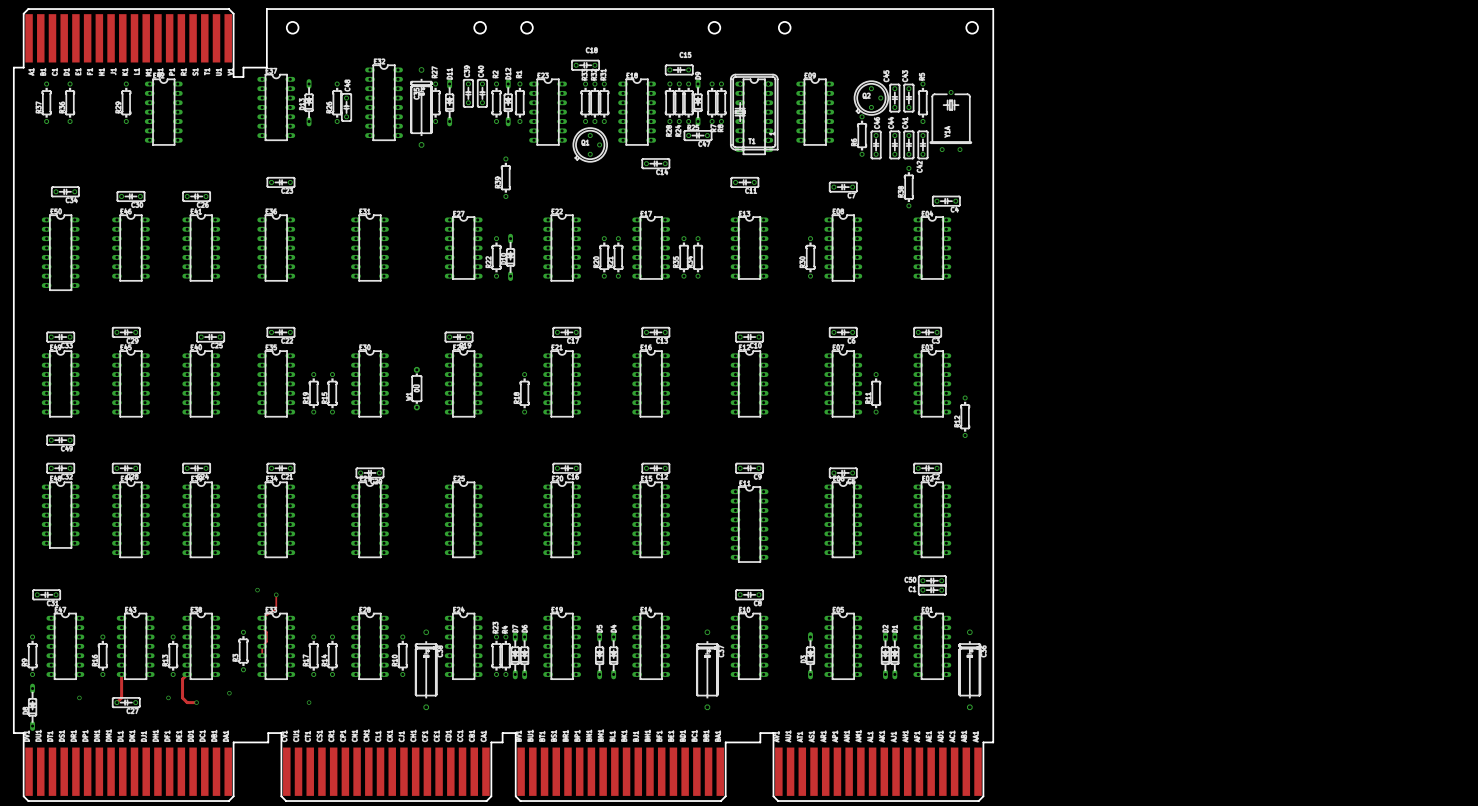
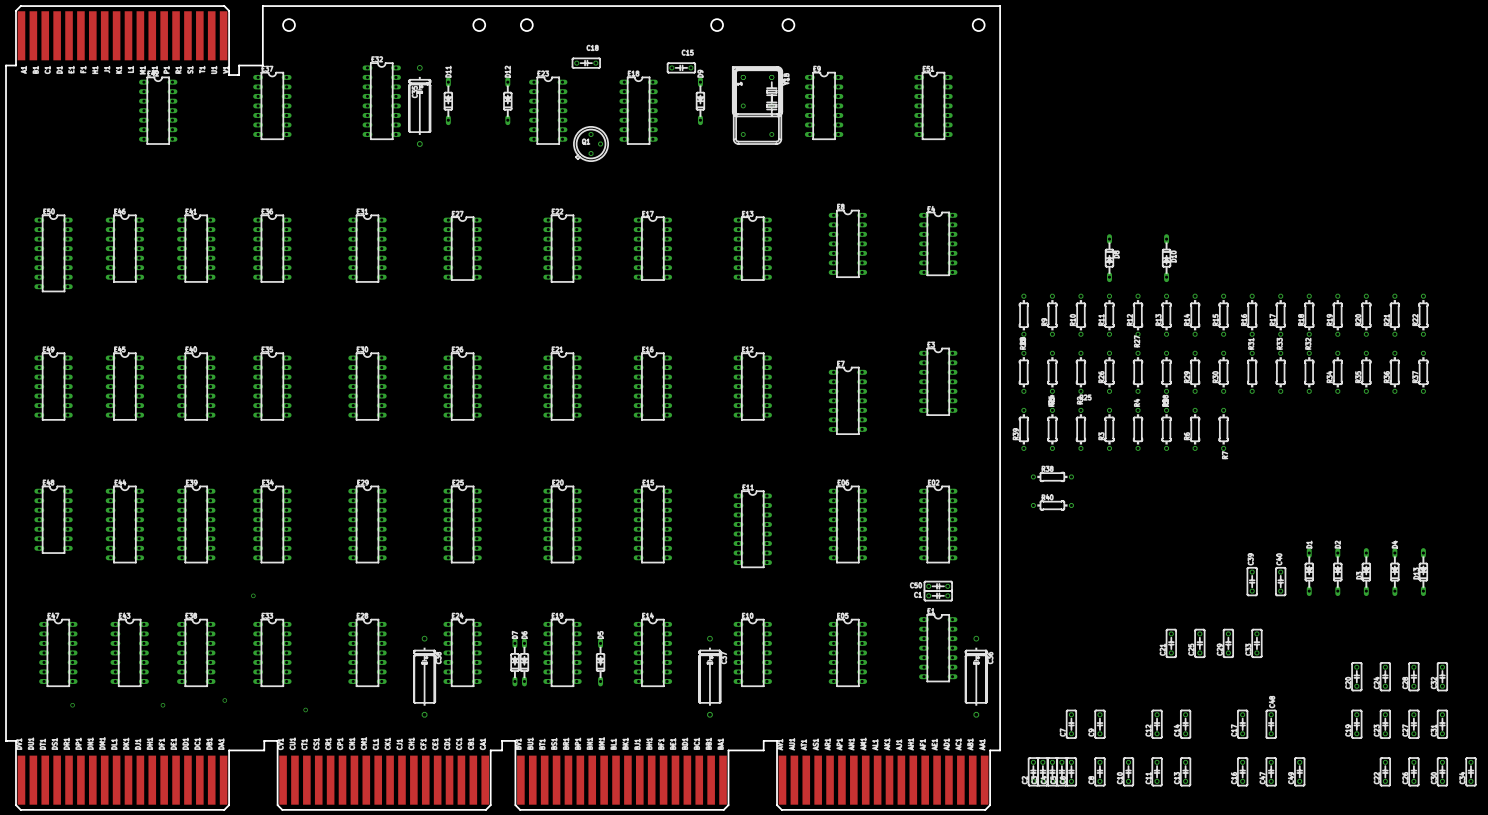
part position: (468, 93) -> (1252, 581)
part position: (482, 93) -> (1280, 581)
part: none -> (757, 91)
part: (871, 98) -> none
part: (894, 98) -> none
part: (908, 98) -> none
part position: (46, 102) -> (1423, 372)
part position: (70, 102) -> (1394, 372)
part position: (126, 102) -> (1195, 372)
part position: (309, 102) -> (1423, 572)
part position: (337, 102) -> (1109, 372)
part position: (435, 102) -> (1138, 372)
part position: (496, 102) -> (1080, 429)
part position: (519, 102) -> (1052, 429)
part position: (585, 102) -> (1280, 372)
part position: (594, 102) -> (1309, 372)
part position: (604, 102) -> (1252, 372)
part position: (669, 102) -> (1166, 372)
part position: (679, 102) -> (1052, 372)
part position: (688, 102) -> (1080, 372)
part position: (712, 102) -> (1223, 429)
part position: (721, 102) -> (1023, 315)
part position: (922, 102) -> (1166, 429)
part position: (346, 107) -> (1271, 724)
part: none -> (757, 105)
part: none -> (824, 105)
part: none -> (933, 105)
part: (754, 112) -> none
part: (815, 112) -> none
part: (754, 116) -> none
part: (950, 121) -> none
part rotation: 0° (698, 135) -> 90° clockwise (1271, 771)
part position: (698, 135) -> (1271, 771)
part position: (862, 135) -> (1195, 429)
part: (876, 144) -> none
part: (894, 144) -> none
part: (908, 144) -> none
part: (922, 144) -> none
part rotation: 0° (655, 163) -> 90° clockwise (1185, 724)
part position: (655, 163) -> (1185, 724)
part position: (505, 177) -> (1023, 429)
part rotation: 0° (280, 182) -> 90° clockwise (1385, 724)
part position: (280, 182) -> (1385, 724)
part rotation: 0° (744, 182) -> 90° clockwise (1157, 771)
part position: (744, 182) -> (1157, 771)
part rotation: 0° (843, 187) -> 90° clockwise (1071, 724)
part position: (843, 187) -> (1071, 724)
part rotation: 0° (908, 187) -> 90° clockwise (1052, 476)
part position: (908, 187) -> (1052, 476)
part rotation: 0° (65, 191) -> 90° clockwise (1470, 771)
part position: (65, 191) -> (1470, 771)
part rotation: 0° (130, 196) -> 90° clockwise (1442, 771)
part position: (130, 196) -> (1442, 771)
part rotation: 0° (196, 196) -> 90° clockwise (1413, 771)
part position: (196, 196) -> (1413, 771)
part rotation: 0° (946, 201) -> 90° clockwise (1052, 771)
part position: (946, 201) -> (1052, 771)
part: none -> (847, 243)
part: none -> (938, 243)
part: (843, 248) -> none
part: (932, 248) -> none
part position: (496, 257) -> (1423, 315)
part rotation: 0° (510, 257) -> 180° (1166, 258)
part position: (510, 257) -> (1166, 258)
part position: (604, 257) -> (1366, 315)
part position: (618, 257) -> (1394, 315)
part position: (683, 257) -> (1366, 372)
part position: (698, 257) -> (1337, 372)
part position: (810, 257) -> (1223, 372)
part rotation: 0° (126, 332) -> 90° clockwise (1228, 643)
part position: (126, 332) -> (1228, 643)
part rotation: 0° (280, 332) -> 90° clockwise (1385, 771)
part position: (280, 332) -> (1385, 771)
part rotation: 0° (566, 332) -> 90° clockwise (1242, 724)
part position: (566, 332) -> (1242, 724)
part rotation: 0° (655, 332) -> 90° clockwise (1185, 771)
part position: (655, 332) -> (1185, 771)
part rotation: 0° (843, 332) -> 90° clockwise (1071, 771)
part position: (843, 332) -> (1071, 771)
part rotation: 0° (927, 332) -> 90° clockwise (1042, 771)
part position: (927, 332) -> (1042, 771)
part rotation: 0° (60, 337) -> 90° clockwise (1256, 643)
part position: (60, 337) -> (1256, 643)
part rotation: 0° (210, 337) -> 90° clockwise (1199, 643)
part position: (210, 337) -> (1199, 643)
part rotation: 0° (459, 337) -> 90° clockwise (1356, 724)
part position: (459, 337) -> (1356, 724)
part rotation: 0° (749, 337) -> 90° clockwise (1128, 771)
part position: (749, 337) -> (1128, 771)
part: none -> (938, 381)
part: (843, 383) -> none
part: (932, 383) -> none
part: (416, 388) -> none
part position: (313, 393) -> (1337, 315)
part position: (332, 393) -> (1223, 315)
part position: (524, 393) -> (1309, 315)
part position: (876, 393) -> (1109, 315)
part: none -> (847, 400)
part position: (965, 416) -> (1138, 315)
part rotation: 0° (60, 440) -> 90° clockwise (1299, 771)
part position: (60, 440) -> (1299, 771)
part rotation: 0° (60, 468) -> 90° clockwise (1442, 676)
part position: (60, 468) -> (1442, 676)
part rotation: 0° (126, 468) -> 90° clockwise (1413, 676)
part position: (126, 468) -> (1413, 676)
part rotation: 0° (196, 468) -> 90° clockwise (1385, 676)
part position: (196, 468) -> (1385, 676)
part rotation: 0° (280, 468) -> 90° clockwise (1171, 643)
part position: (280, 468) -> (1171, 643)
part rotation: 0° (566, 468) -> 90° clockwise (1242, 771)
part position: (566, 468) -> (1242, 771)
part rotation: 0° (655, 468) -> 90° clockwise (1157, 724)
part position: (655, 468) -> (1157, 724)
part rotation: 0° (749, 468) -> 90° clockwise (1099, 724)
part position: (749, 468) -> (1099, 724)
part rotation: 0° (927, 468) -> 90° clockwise (1033, 771)
part position: (927, 468) -> (1033, 771)
part rotation: 0° (369, 472) -> 90° clockwise (1356, 676)
part position: (369, 472) -> (1356, 676)
part rotation: 0° (843, 472) -> 90° clockwise (1061, 771)
part position: (843, 472) -> (1061, 771)
part: none -> (1052, 505)
part rotation: 0° (46, 594) -> 90° clockwise (1442, 724)
part position: (46, 594) -> (1442, 724)
track: (276, 594) (276, 608) (262, 618) -> none
via: (276, 594) -> none
part rotation: 0° (749, 594) -> 90° clockwise (1099, 771)
part position: (749, 594) -> (1099, 771)
track: (262, 627) (266, 632) (266, 641) (262, 646) (262, 655) -> none
part: none -> (938, 648)
part: (932, 646) -> none
part position: (243, 651) -> (1109, 429)
part position: (32, 655) -> (1052, 315)
part position: (102, 655) -> (1252, 315)
part position: (173, 655) -> (1166, 315)
part position: (313, 655) -> (1280, 315)
part position: (332, 655) -> (1195, 315)
part position: (402, 655) -> (1080, 315)
part position: (496, 655) -> (1023, 372)
part position: (505, 655) -> (1138, 429)
part position: (613, 655) -> (1394, 572)
part position: (810, 655) -> (1366, 572)
part position: (885, 655) -> (1337, 572)
part position: (894, 655) -> (1309, 572)
track: (121, 674) (121, 697) (116, 702) -> none
track: (187, 674) (182, 679) (182, 697) (187, 702) (196, 702) -> none
part rotation: 0° (126, 702) -> 90° clockwise (1413, 724)
part position: (126, 702) -> (1413, 724)
via: (196, 702) -> none
part rotation: 0° (32, 707) -> 180° (1109, 258)
part position: (32, 707) -> (1109, 258)

